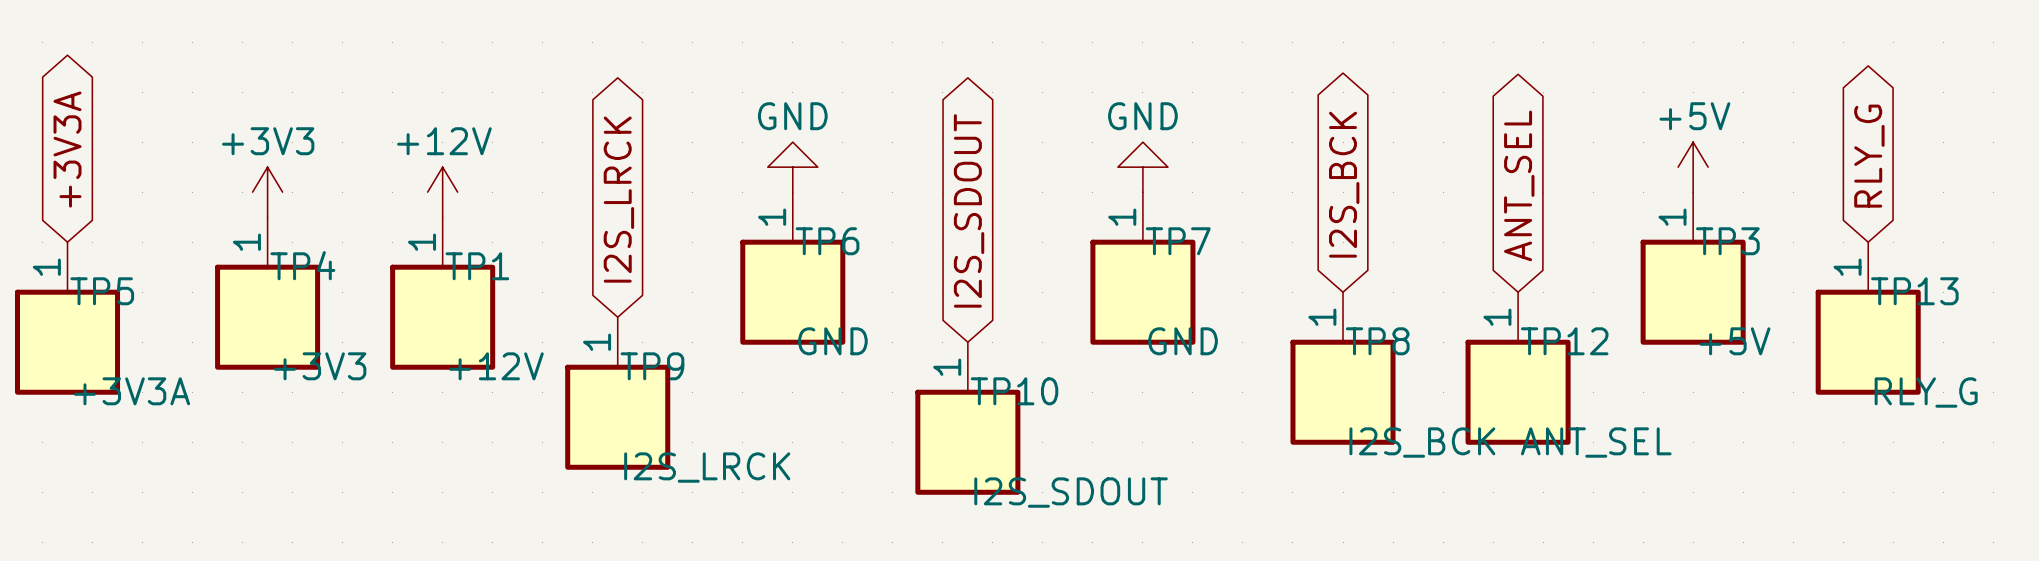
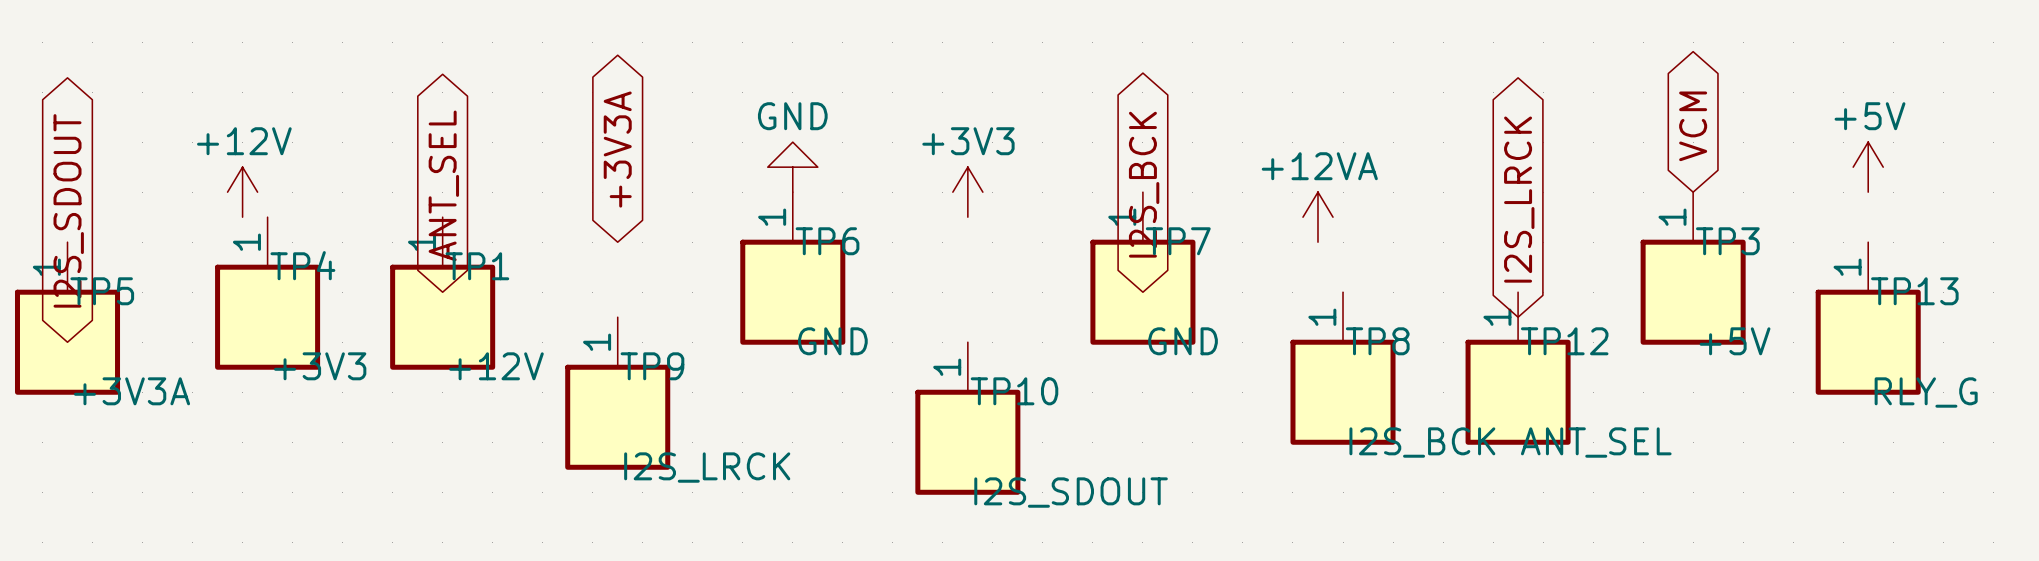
global label: none -> VCM (1693, 126)
global label: +3V3A (67, 149) -> none
global label: none -> +3V3A (617, 149)
global label: RLY_G (1869, 156) -> none
power symbol: GND (1142, 167) -> none
power symbol position: +5V (1693, 167) -> +5V (1868, 167)
global label position: I2S_BCK (1344, 184) -> I2S_BCK (1144, 184)
global label: none -> ANT_SEL (443, 185)
global label: ANT_SEL (1519, 185) -> none
power symbol: +3V3 (267, 192) -> none
power symbol position: +12V (442, 192) -> +12V (242, 192)
power symbol: none -> +3V3 (967, 192)
global label: I2S_LRCK (618, 199) -> none
global label: none -> I2S_LRCK (1519, 199)
global label: none -> I2S_SDOUT (68, 210)
global label: I2S_SDOUT (969, 210) -> none
power symbol: none -> +12VA (1317, 217)

